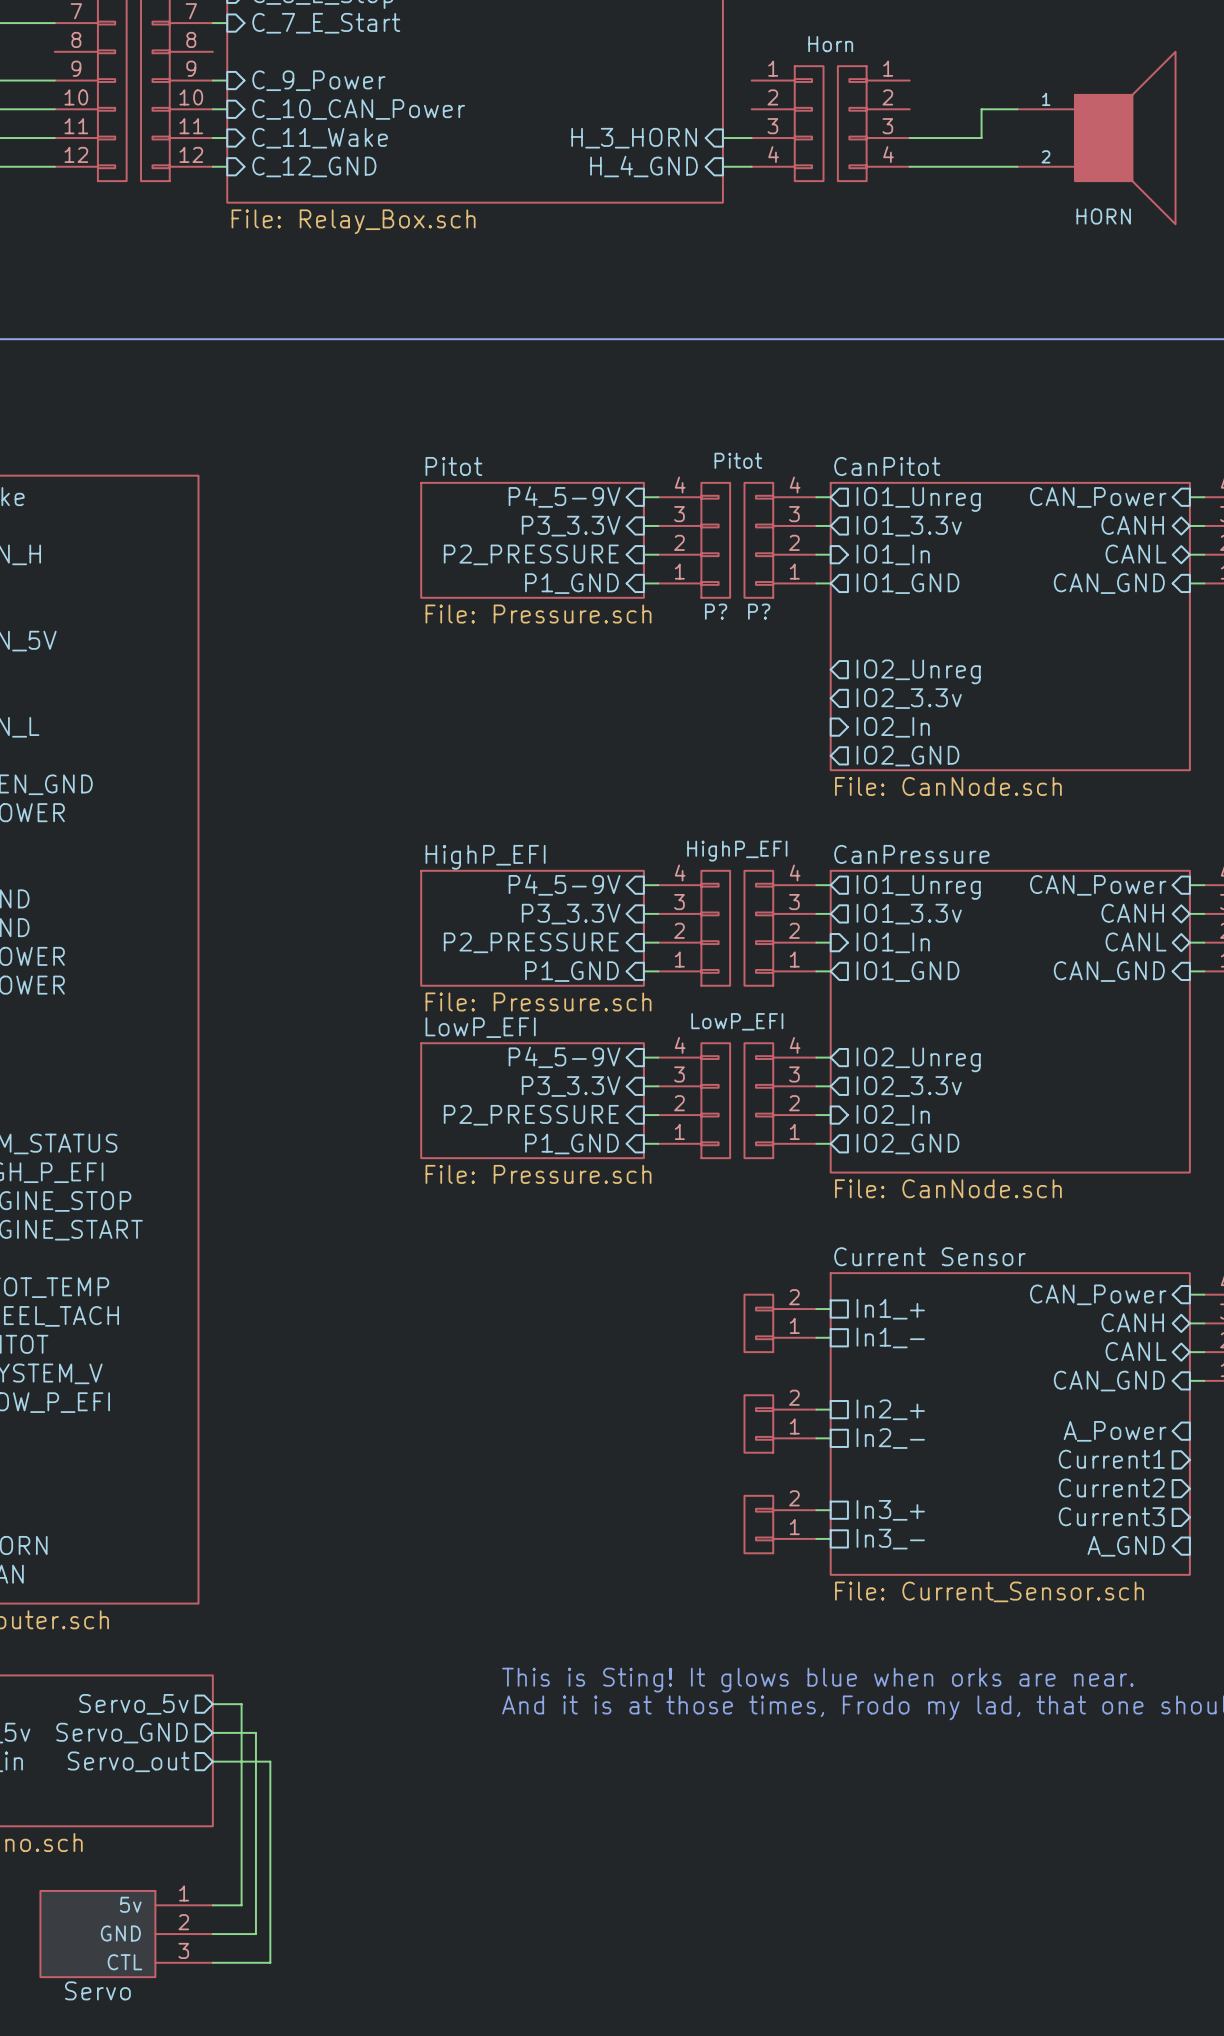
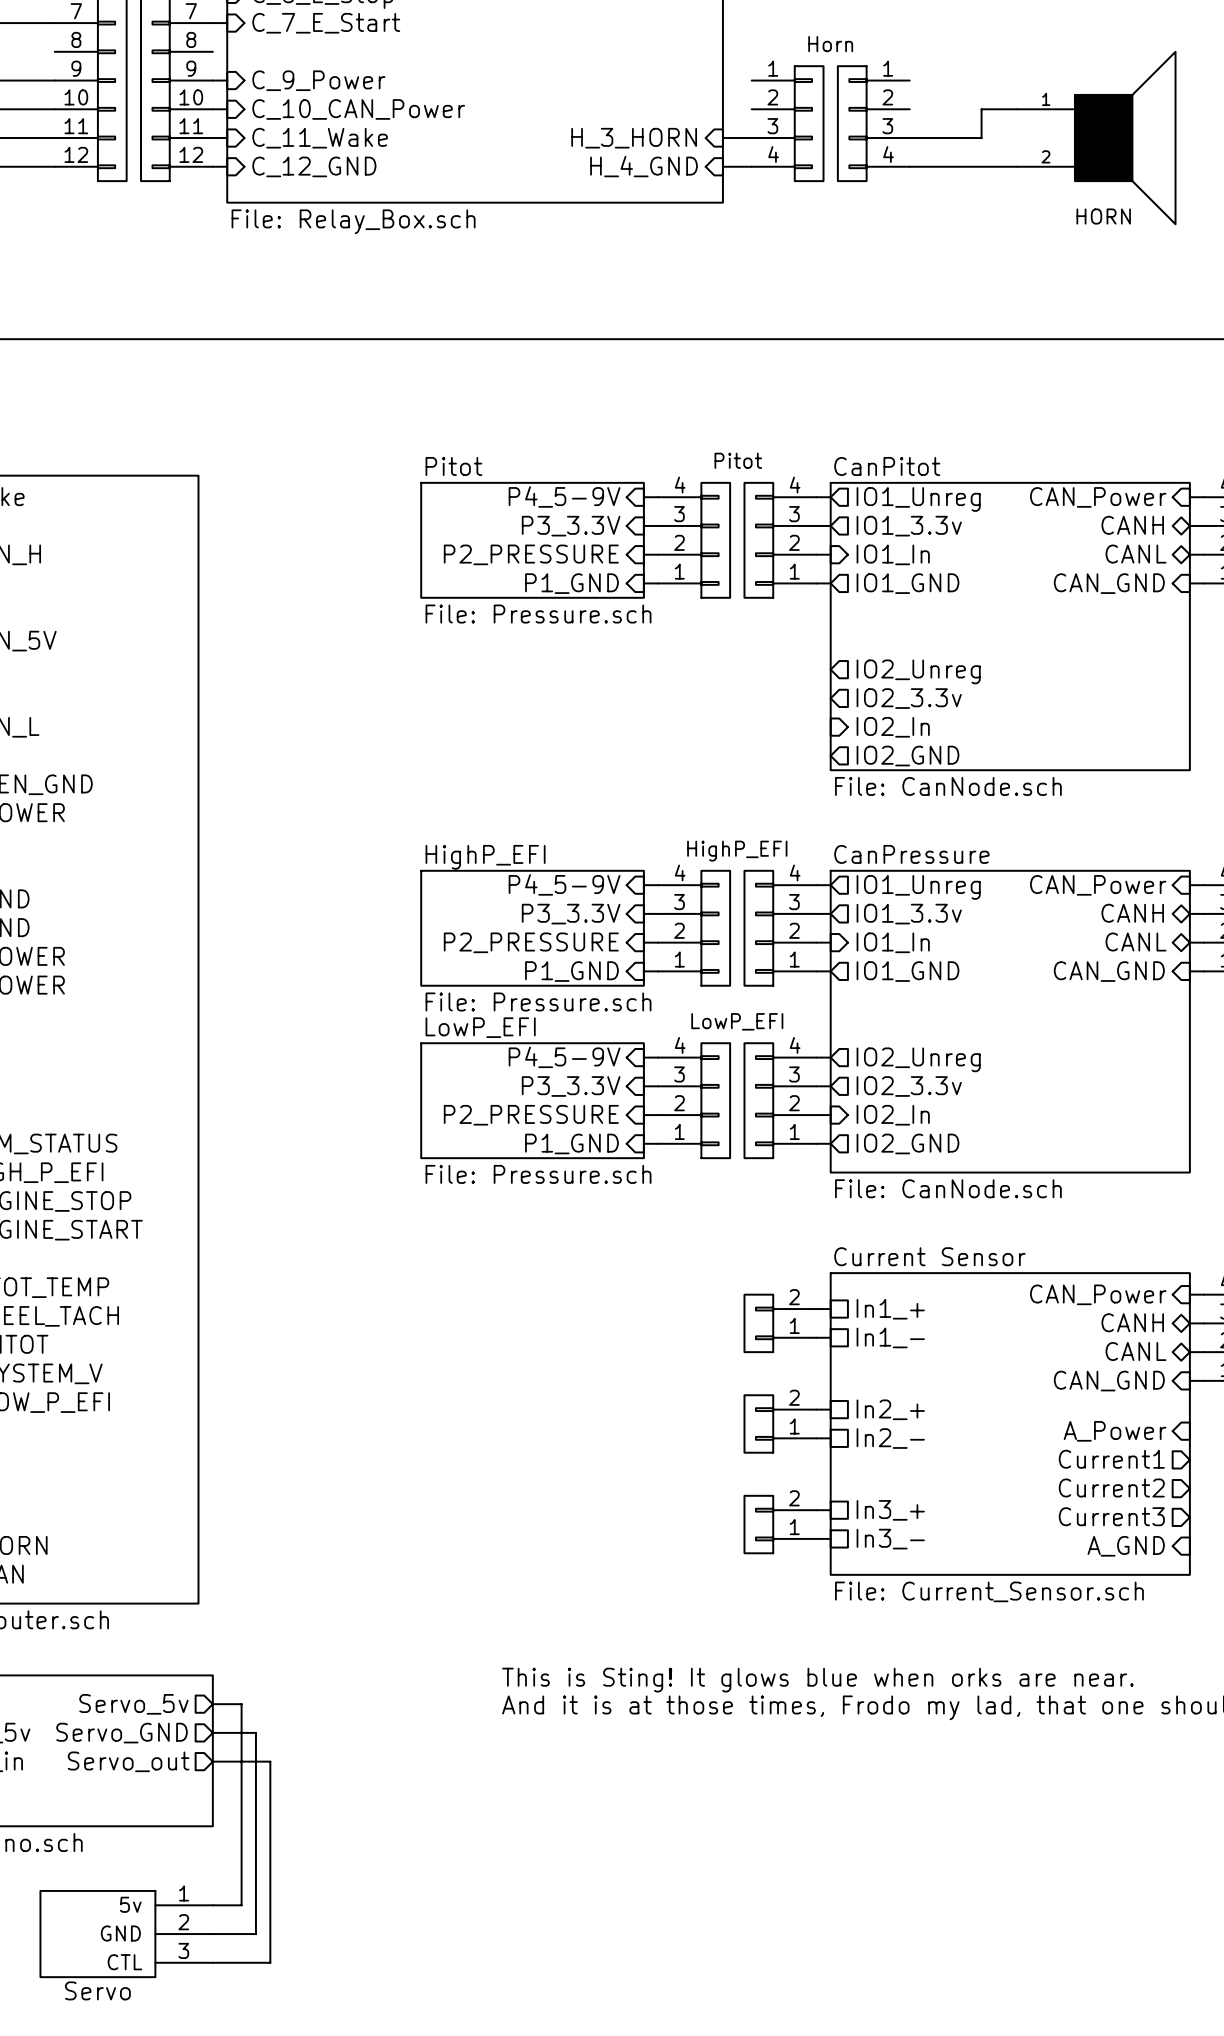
P? name: P? (716, 611) -> none
P? name: P? (759, 611) -> none

